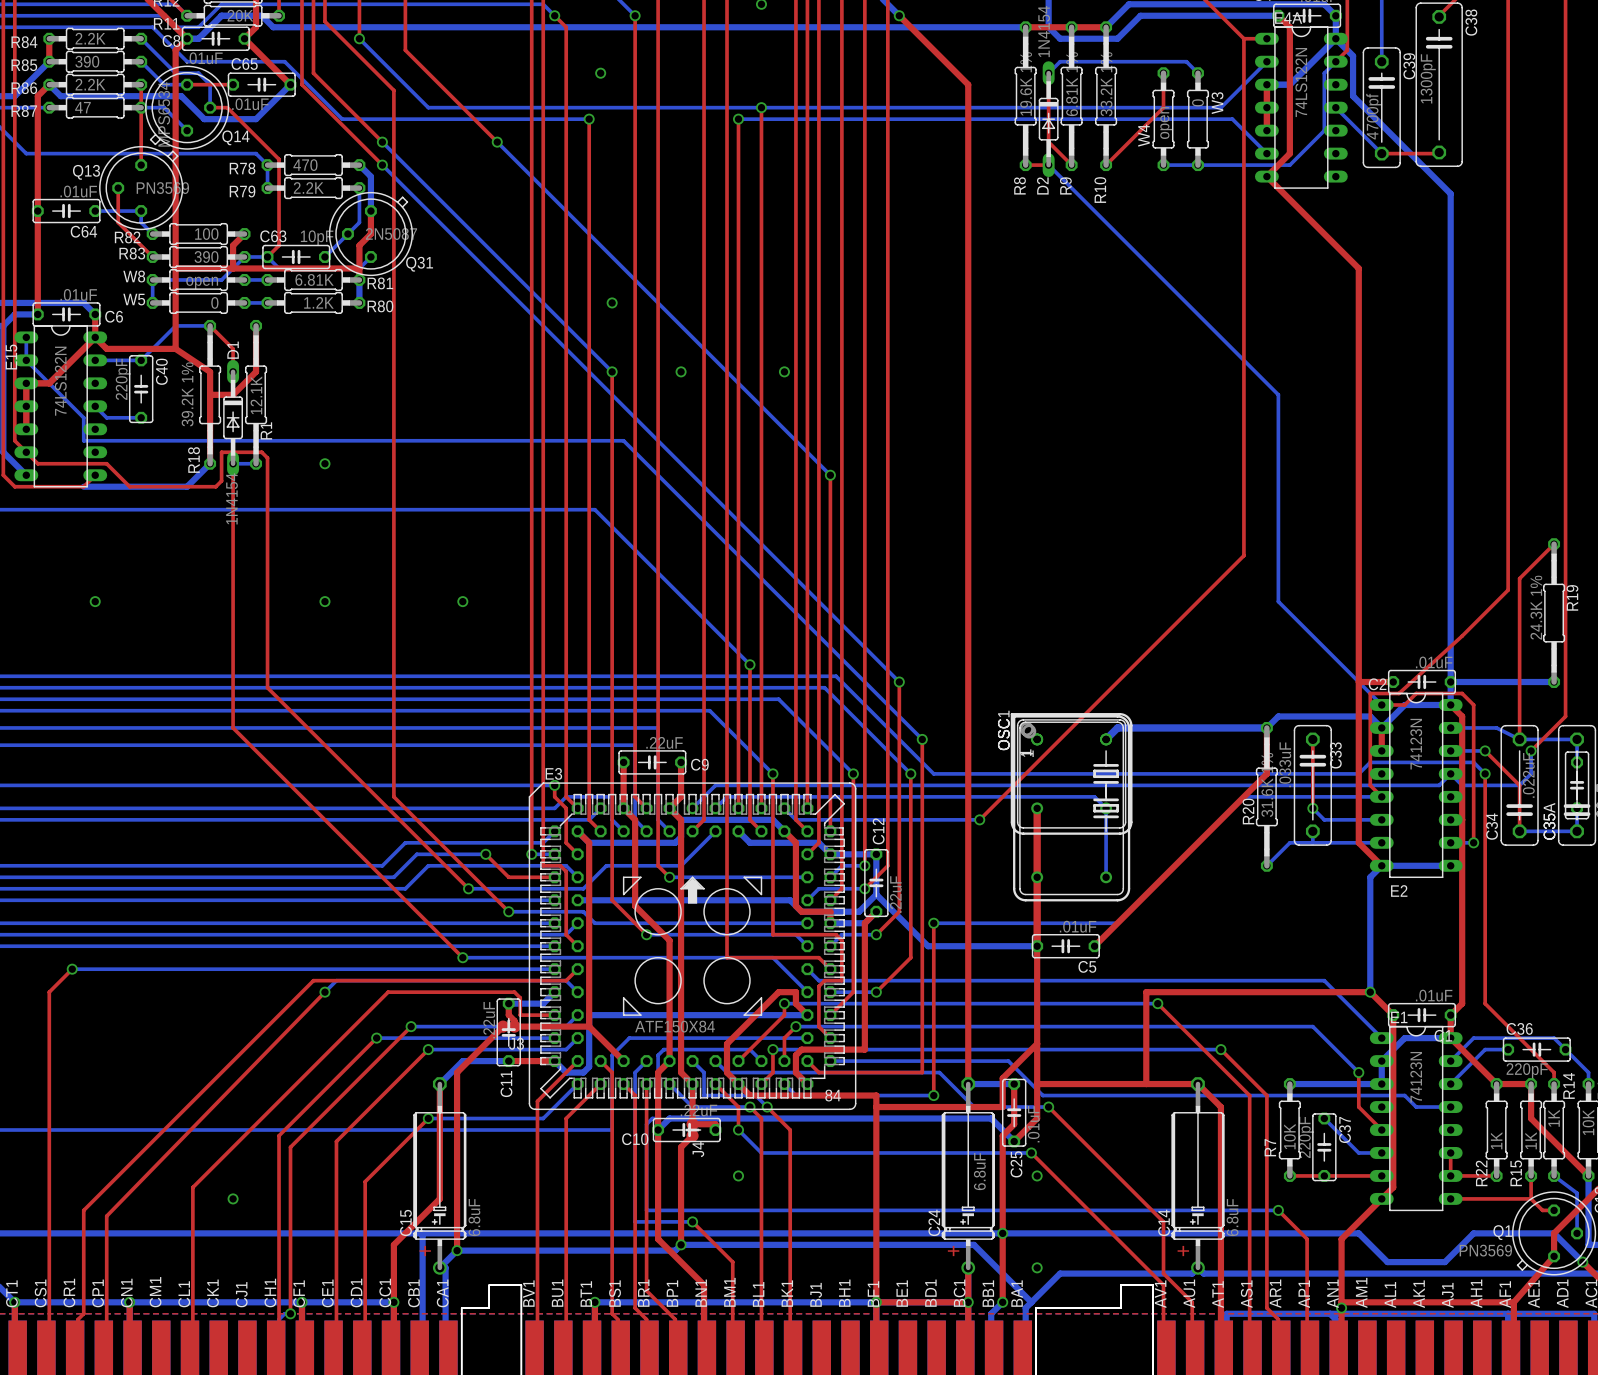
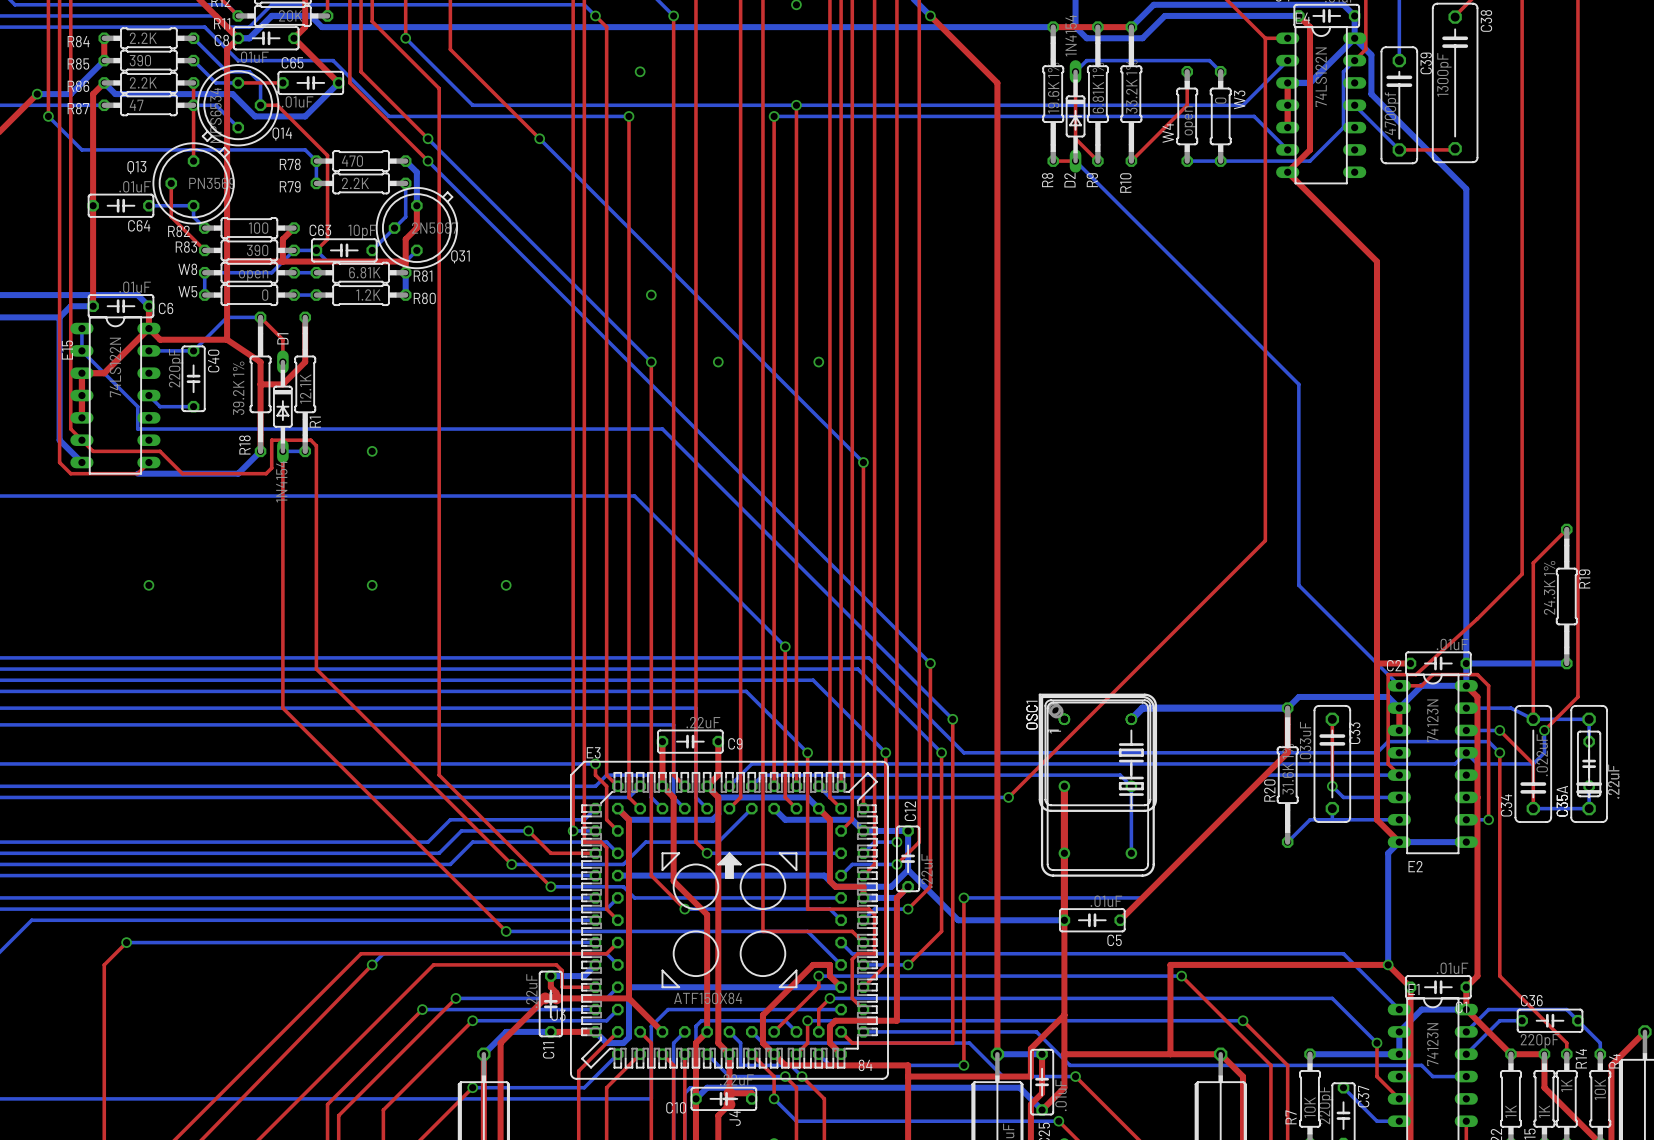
E4A name: E4A (1288, 18) -> E4 (1302, 18)

